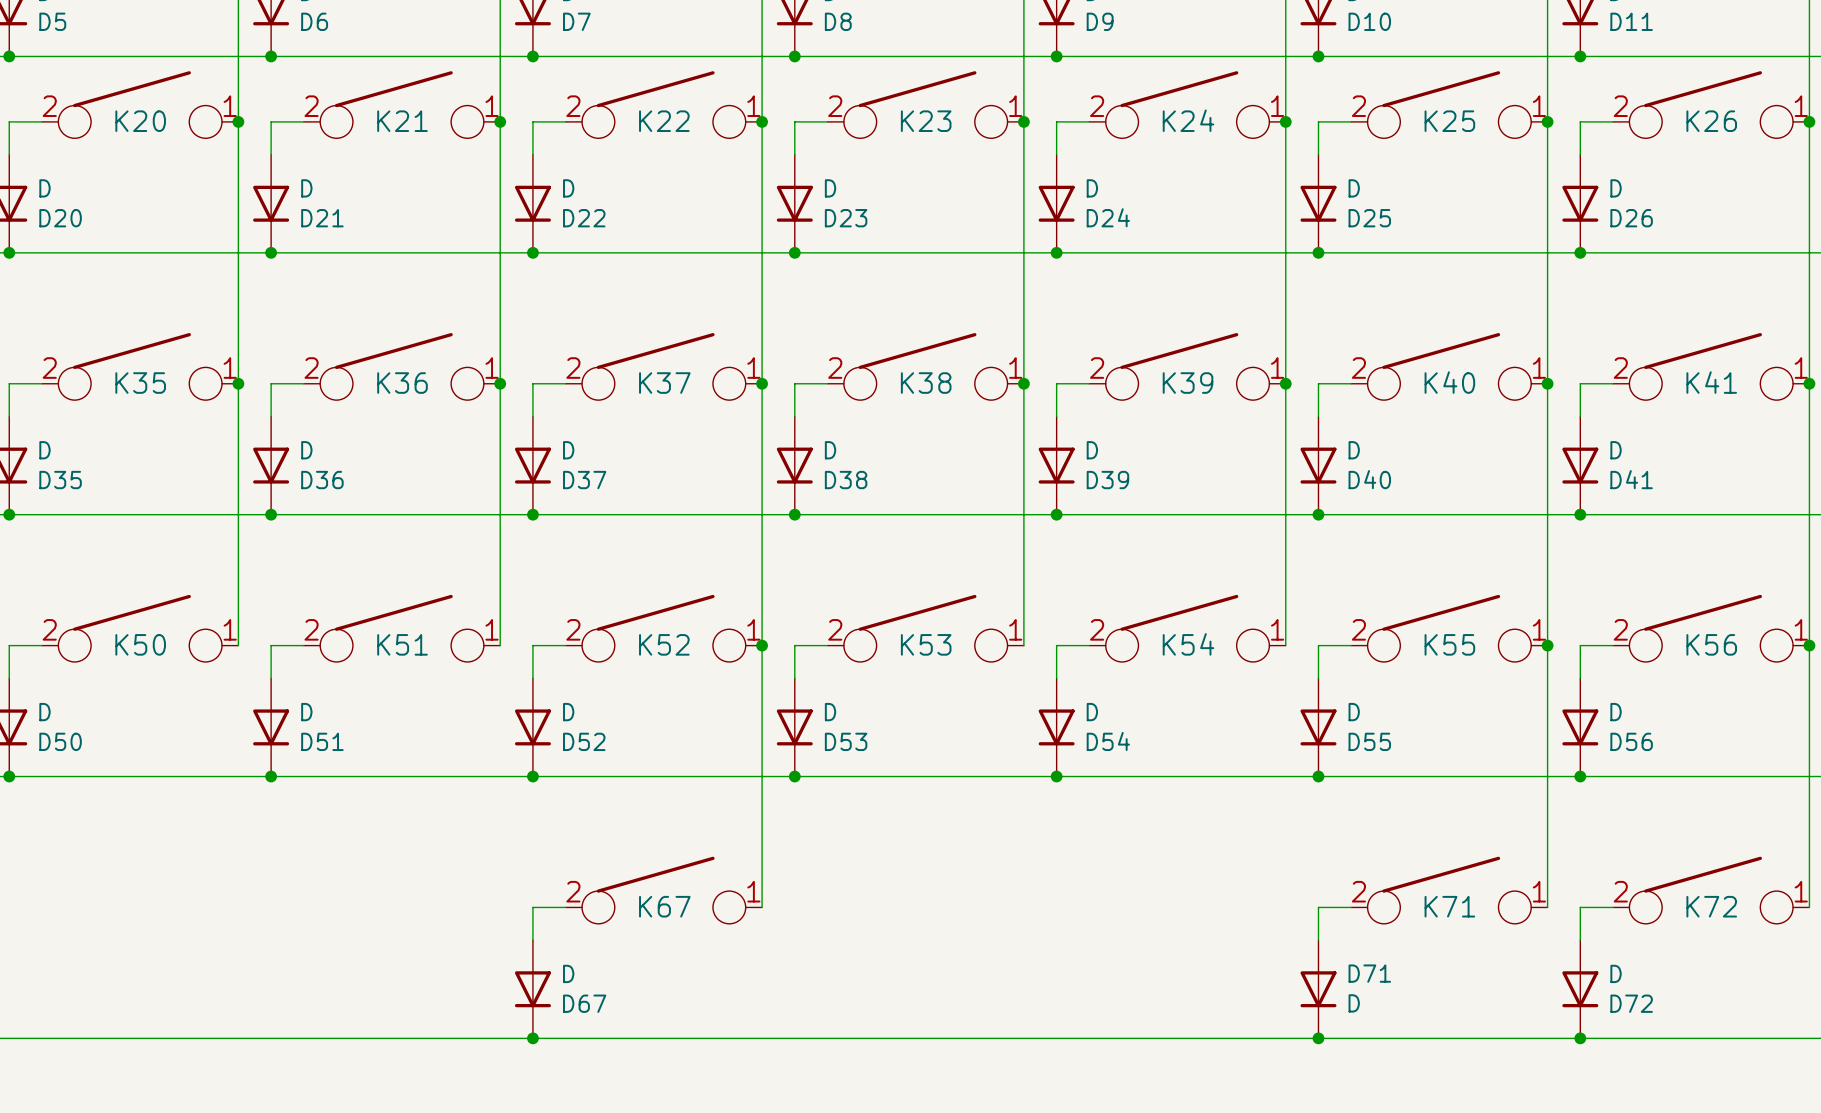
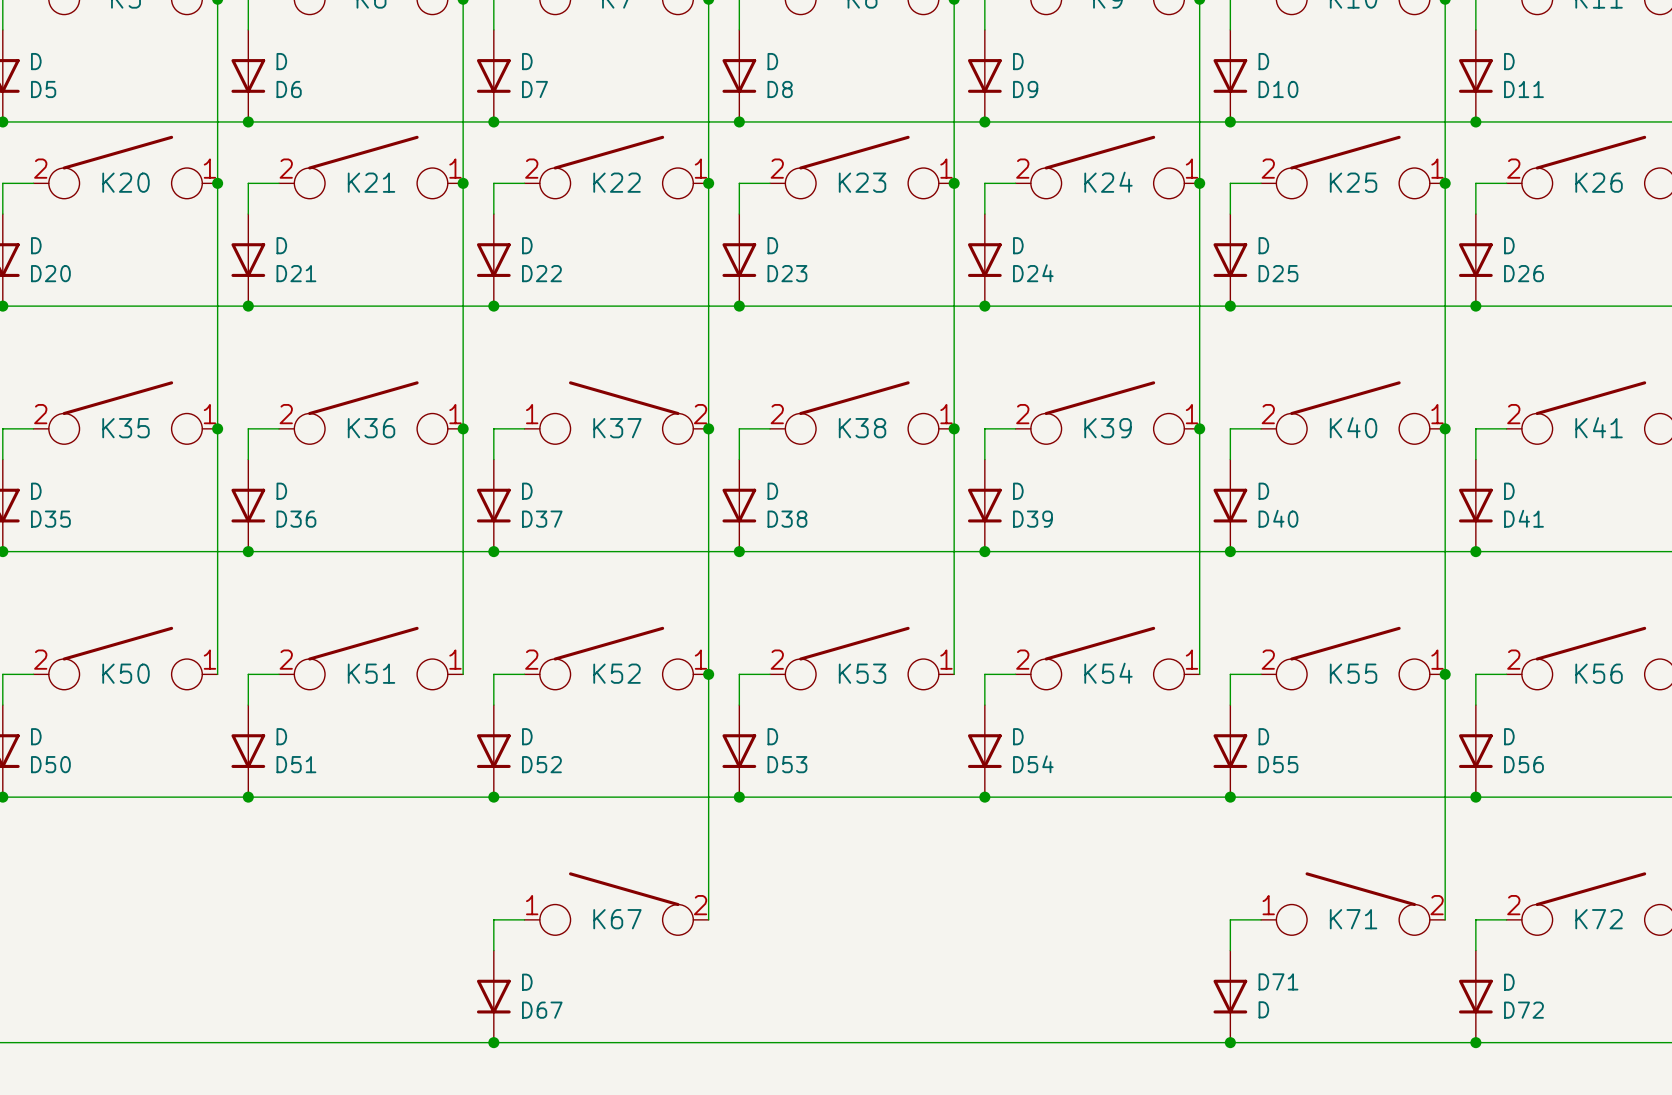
K37 flip: as is (663, 366) -> left-right (616, 412)
K67 flip: as is (663, 890) -> left-right (616, 903)
K71 flip: as is (1449, 890) -> left-right (1353, 903)

